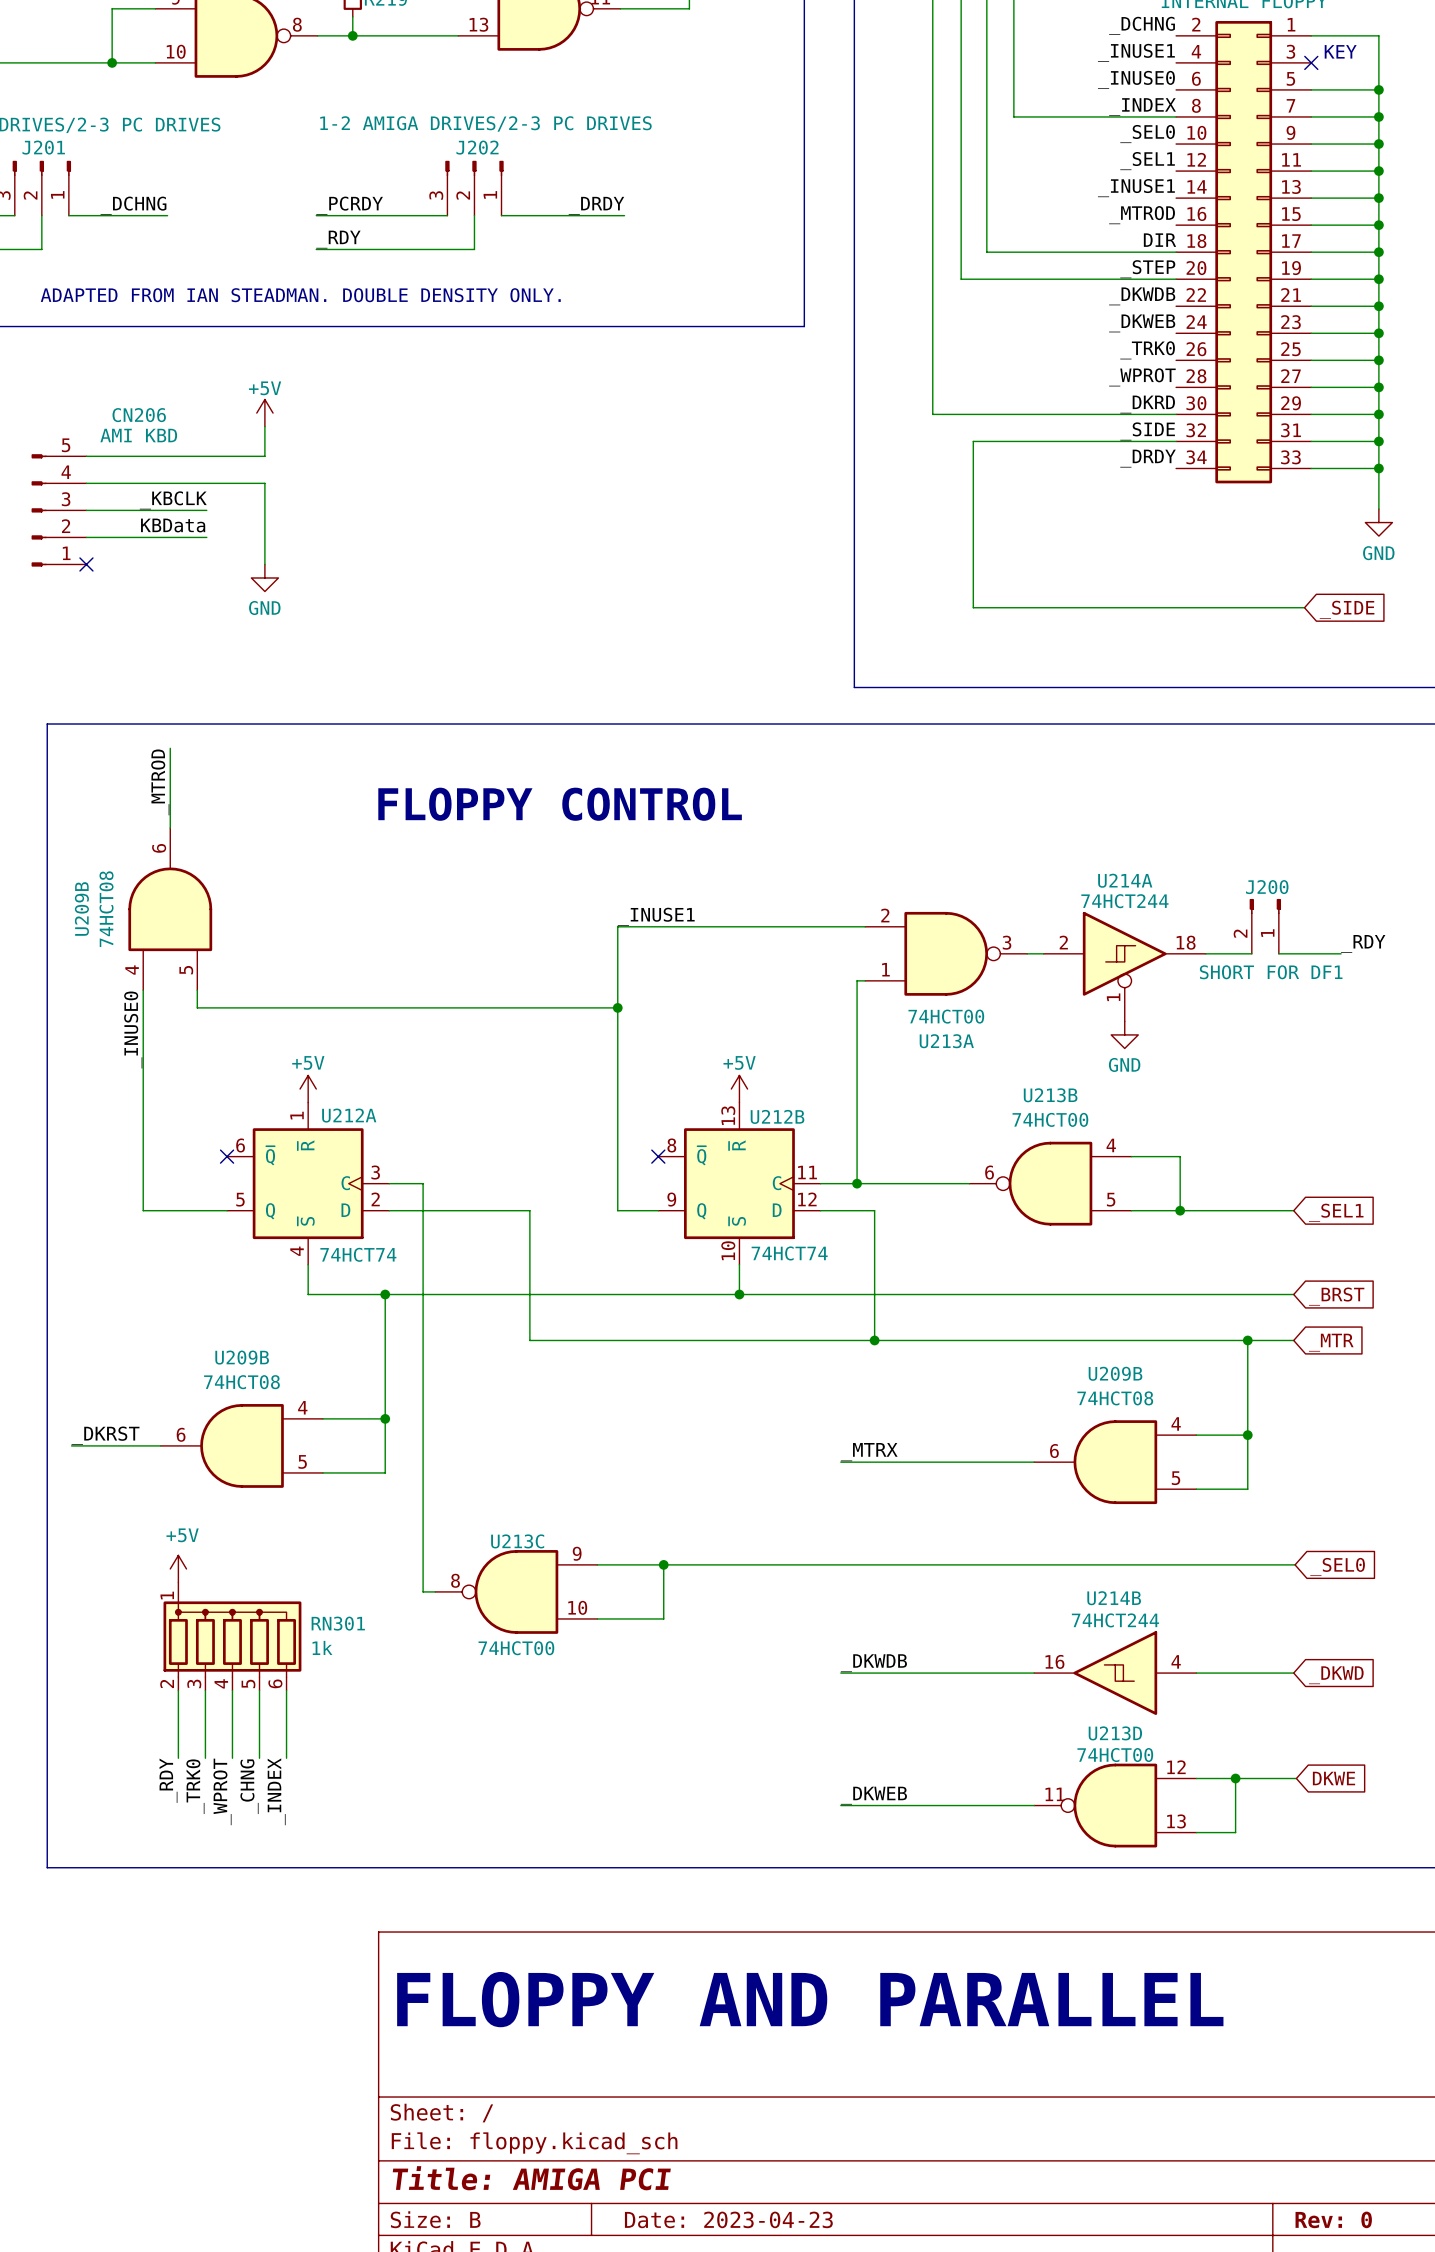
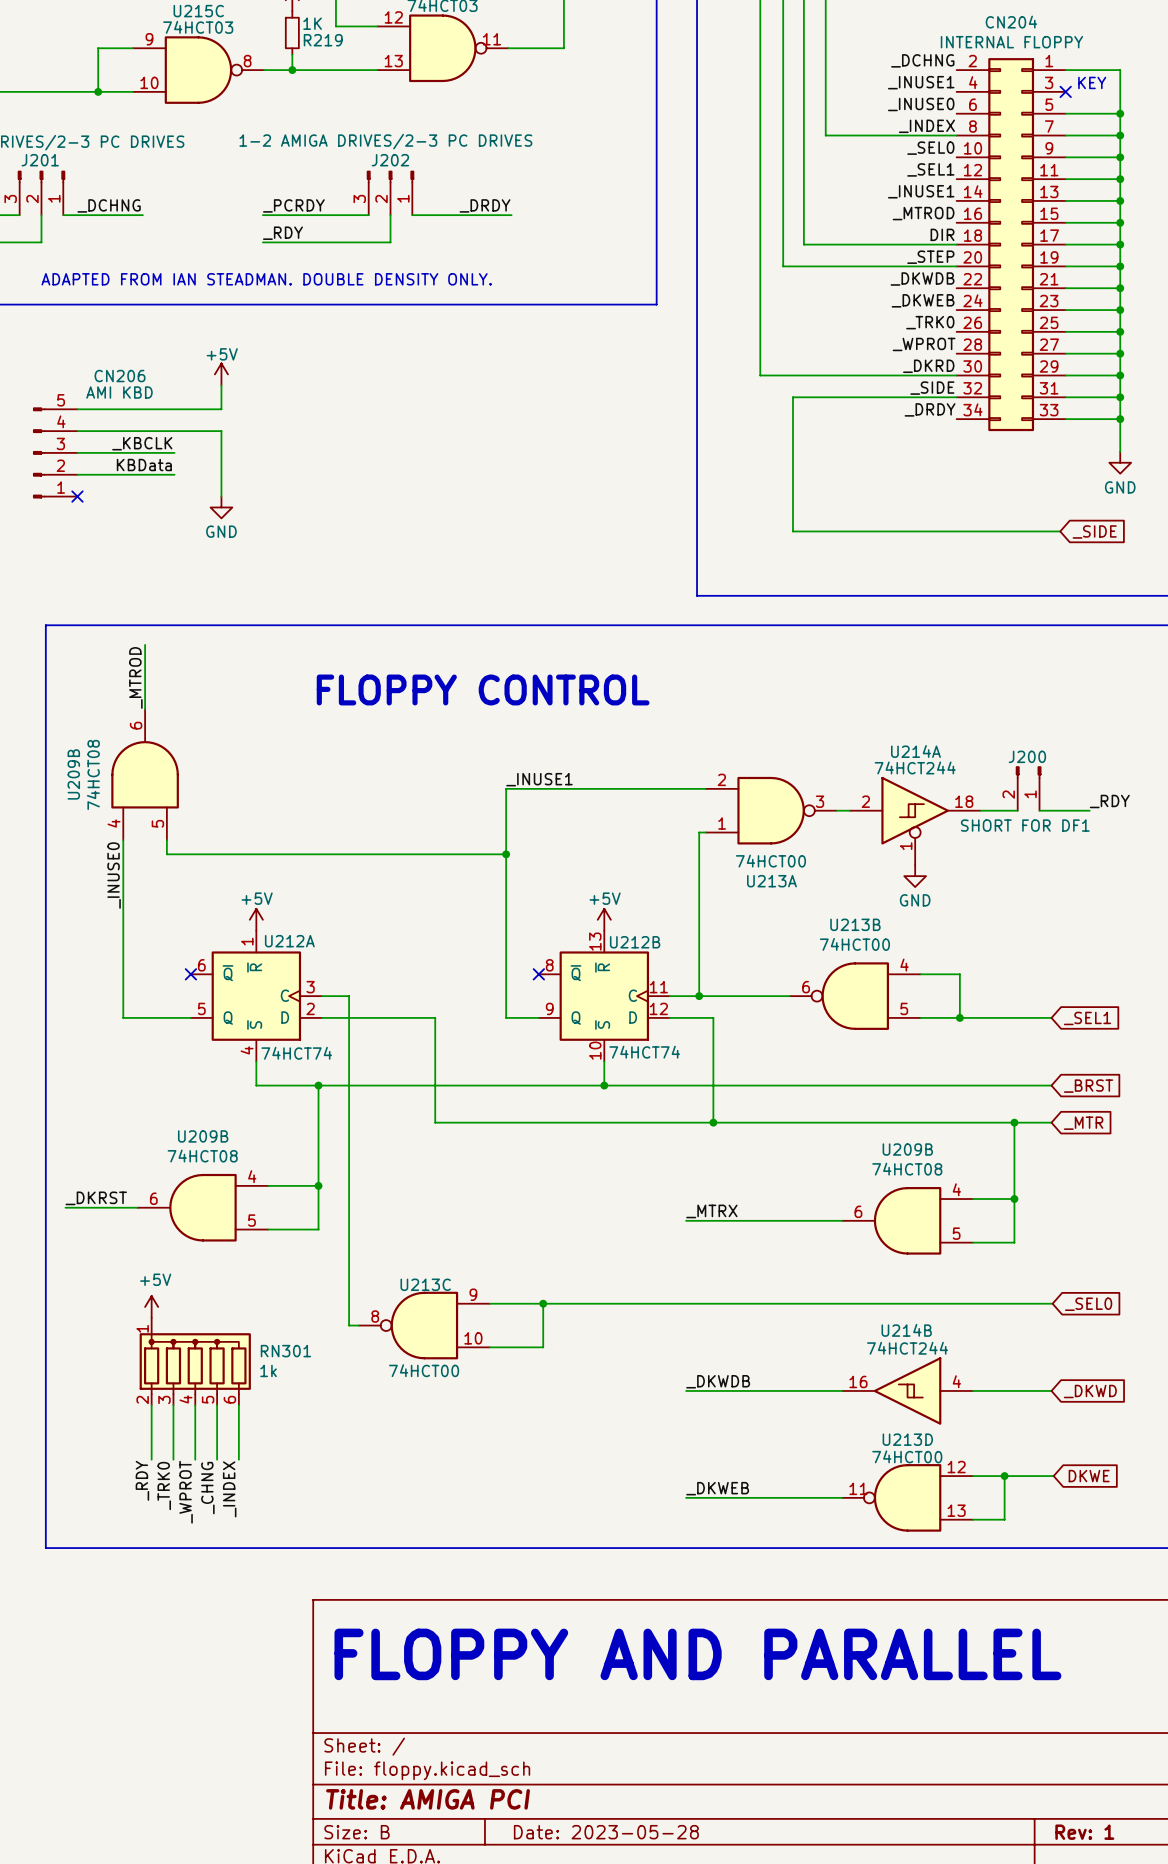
title block: Date: 2023-04-23 (728, 2219) -> Date: 2023-05-28 (606, 1832)
title block: Rev: 0 (1333, 2219) -> Rev: 1 (1084, 1832)

